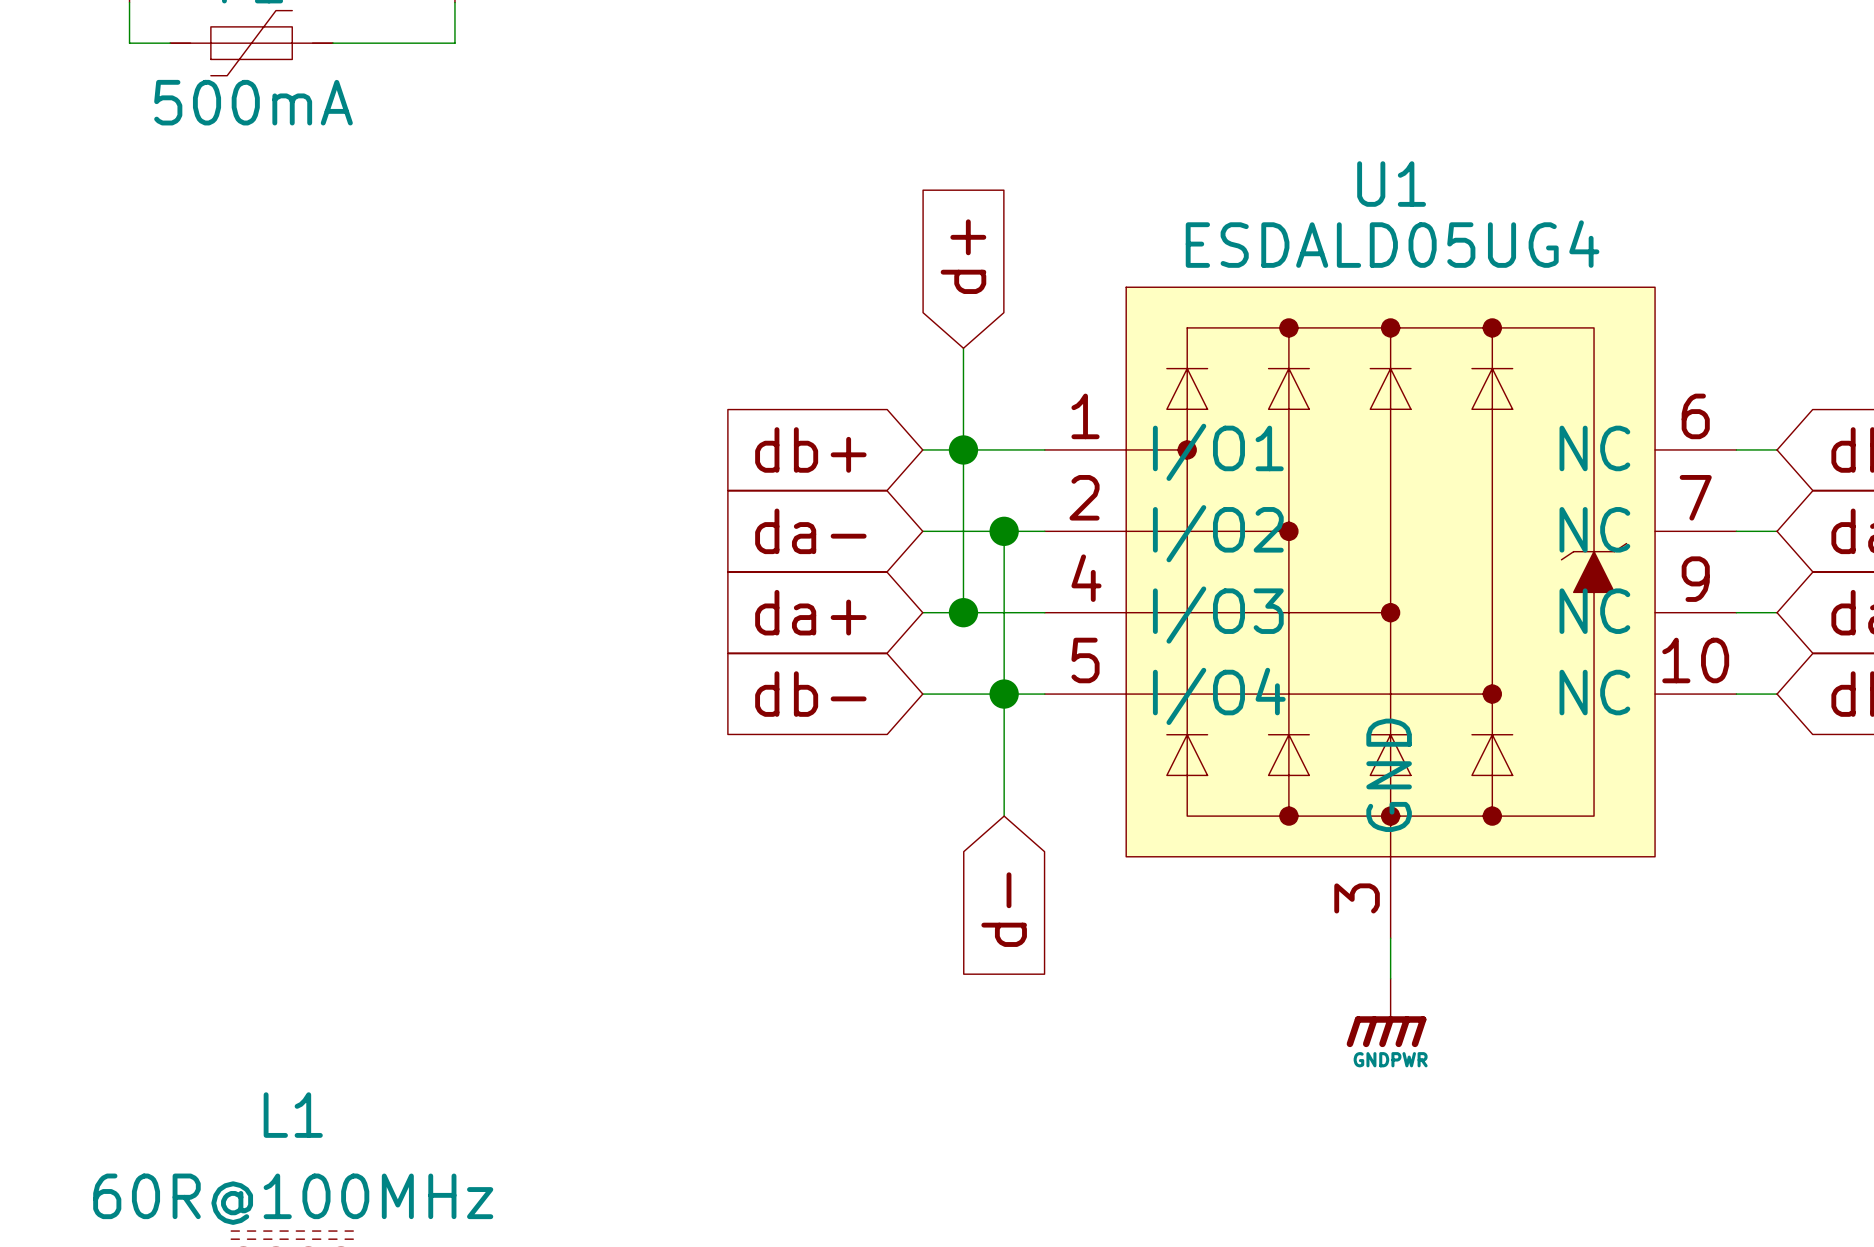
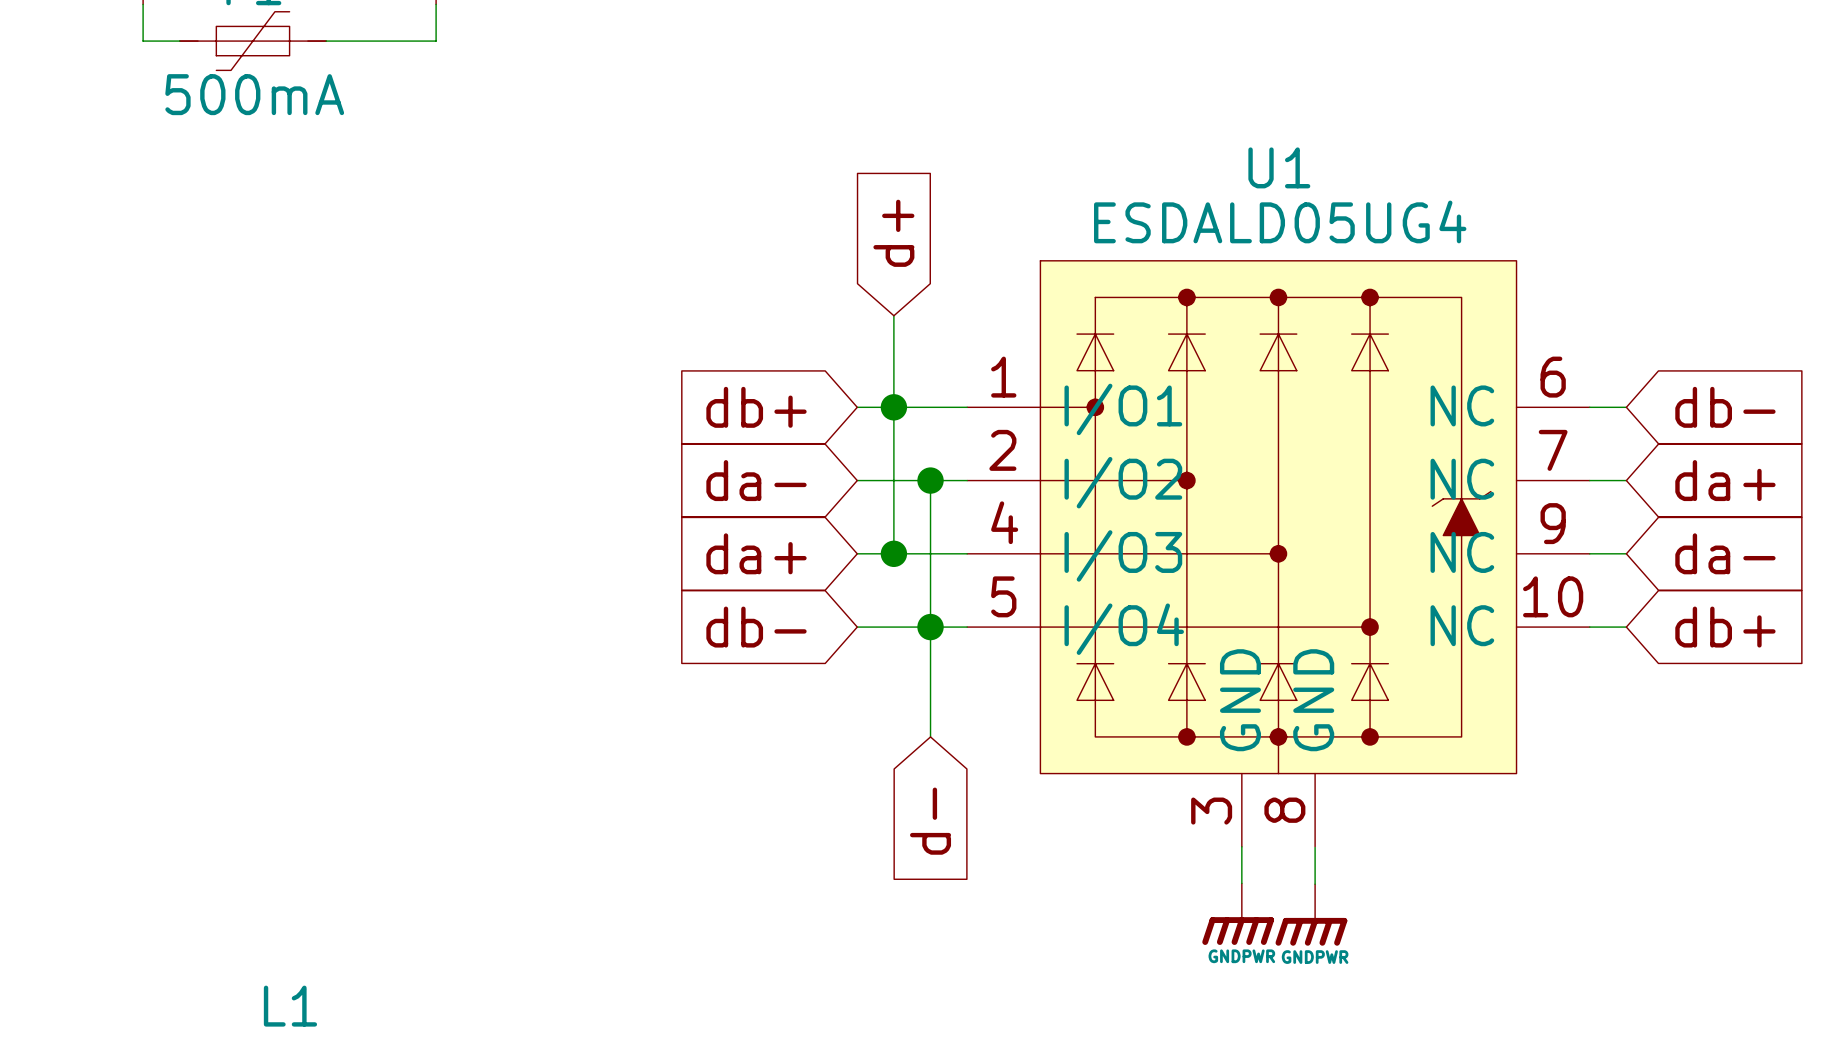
U1 symbol: [1044, 287, 1737, 939] -> [967, 260, 1590, 847]
wire: (1390, 938) (1390, 978) -> (1241, 846) (1241, 883)
wire: none -> (1315, 847) (1315, 884)
power symbol: none -> GNDPWR (1238, 914)
power symbol: GNDPWR (1386, 1012) -> none
power symbol: none -> GNDPWR (1311, 914)

